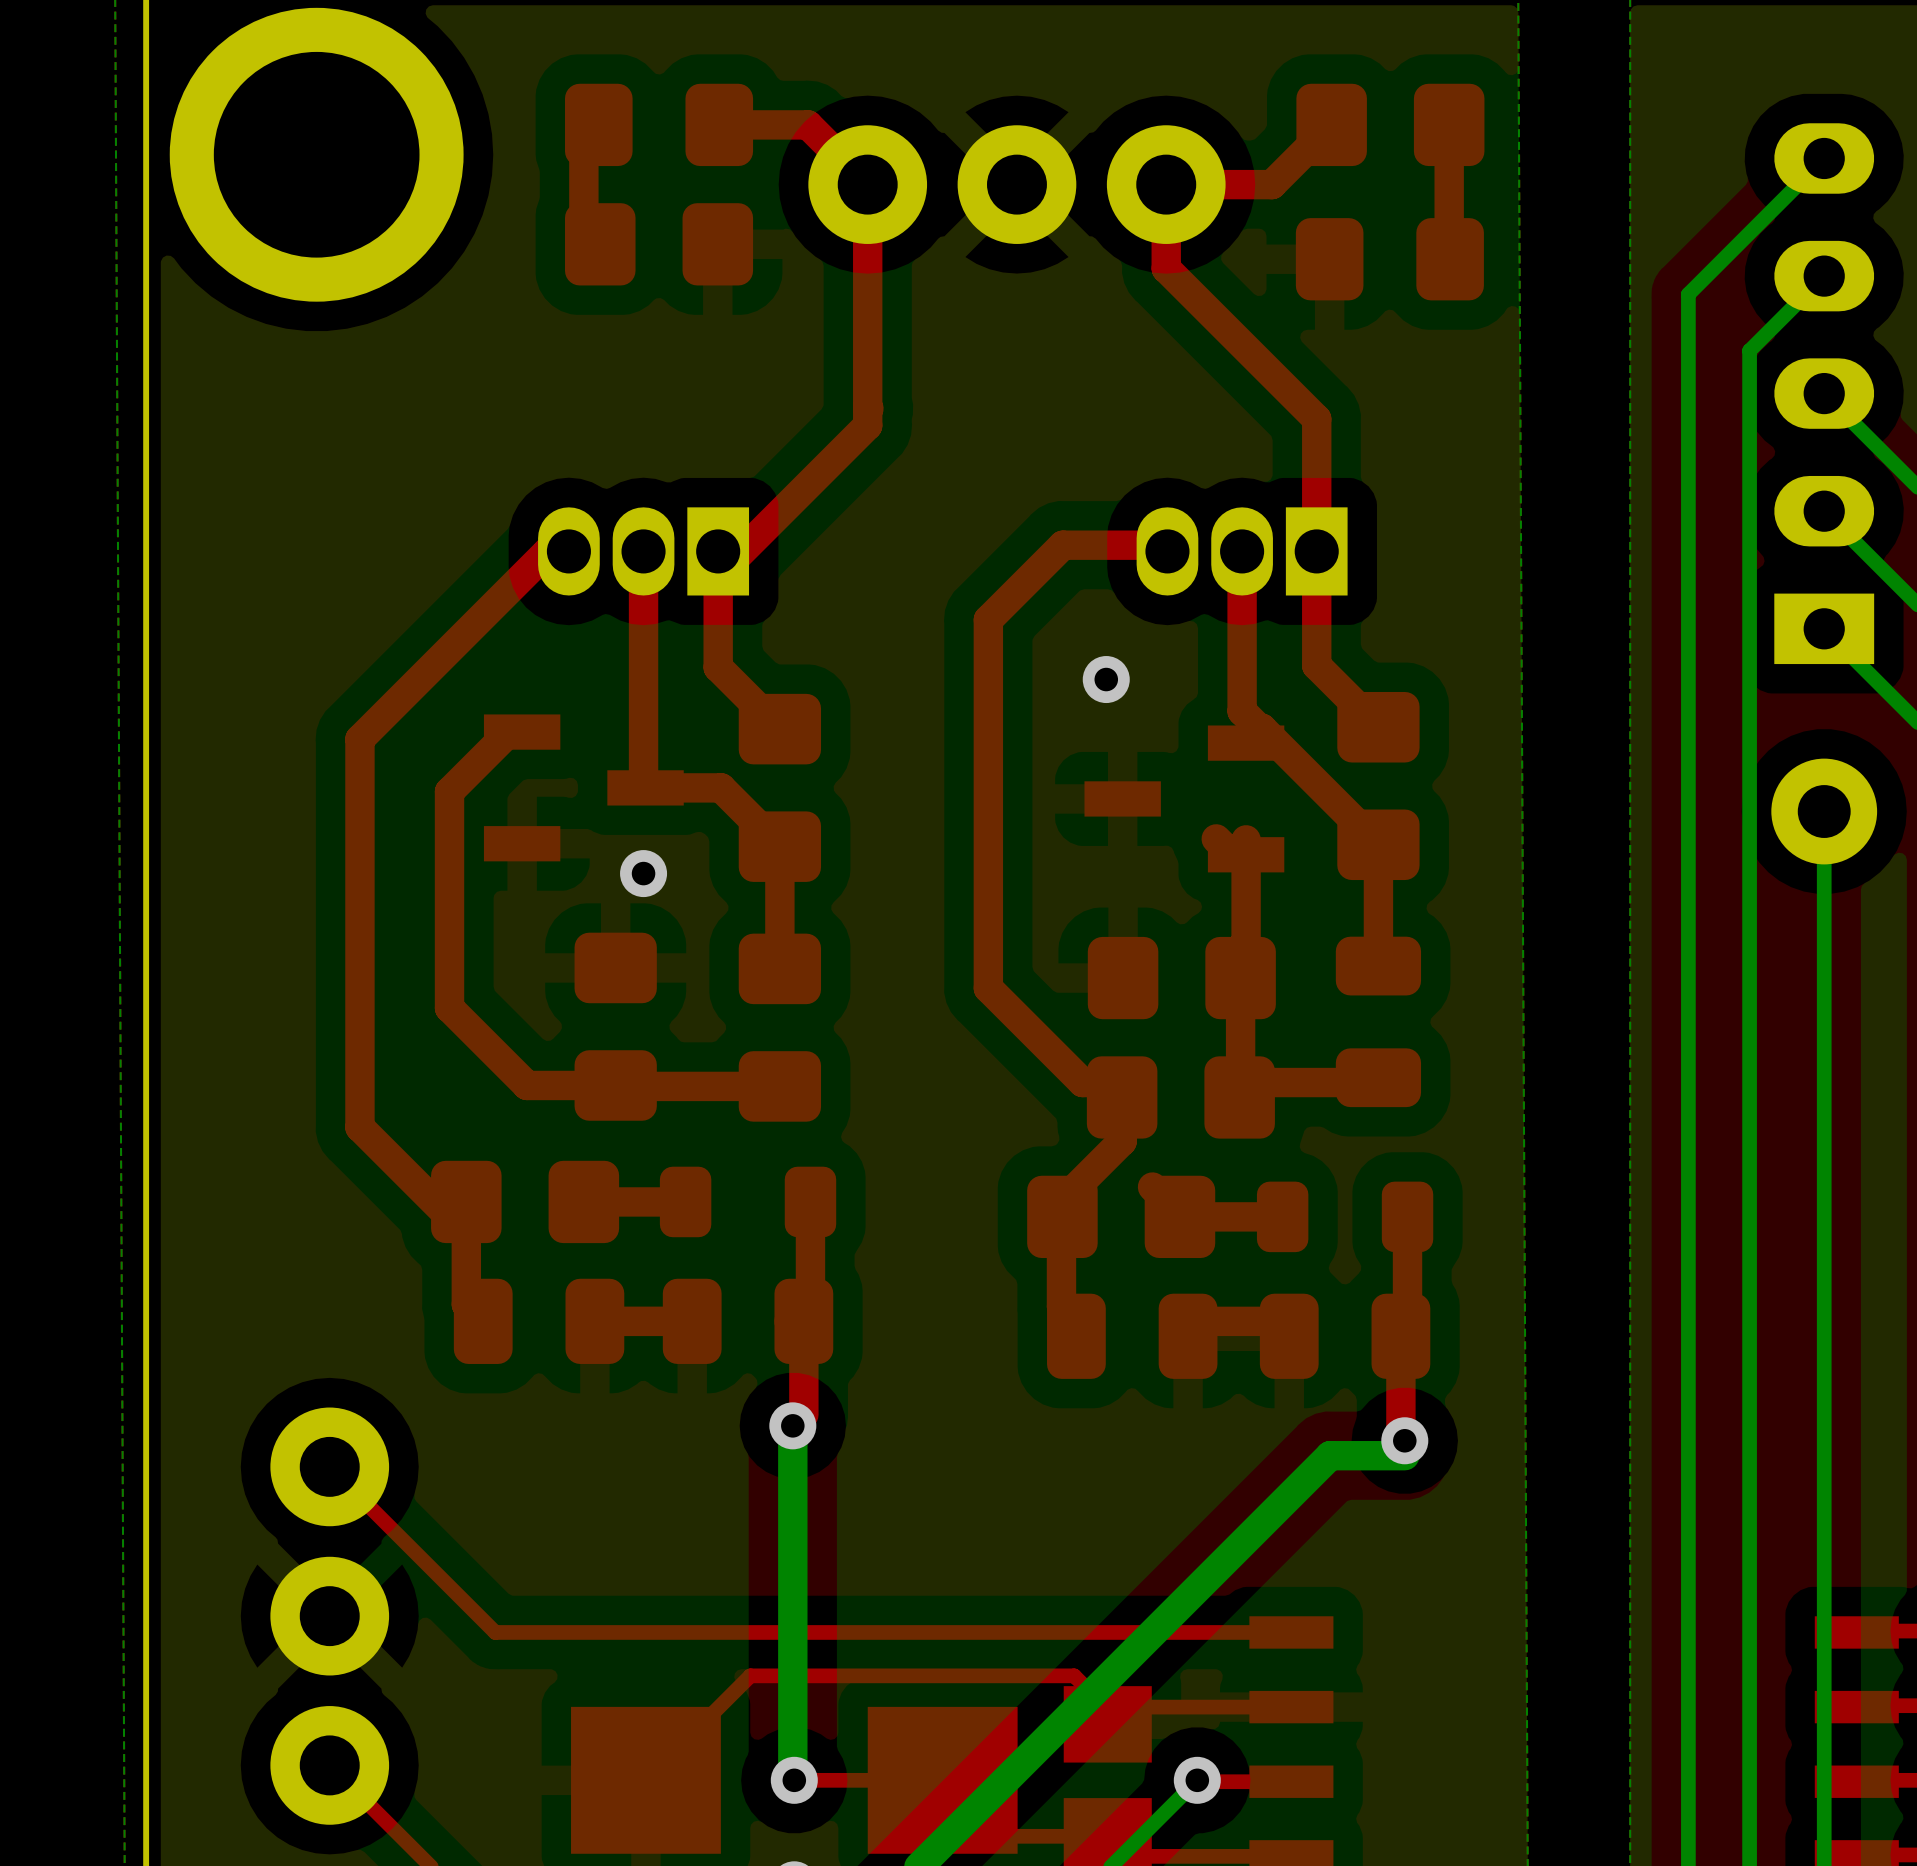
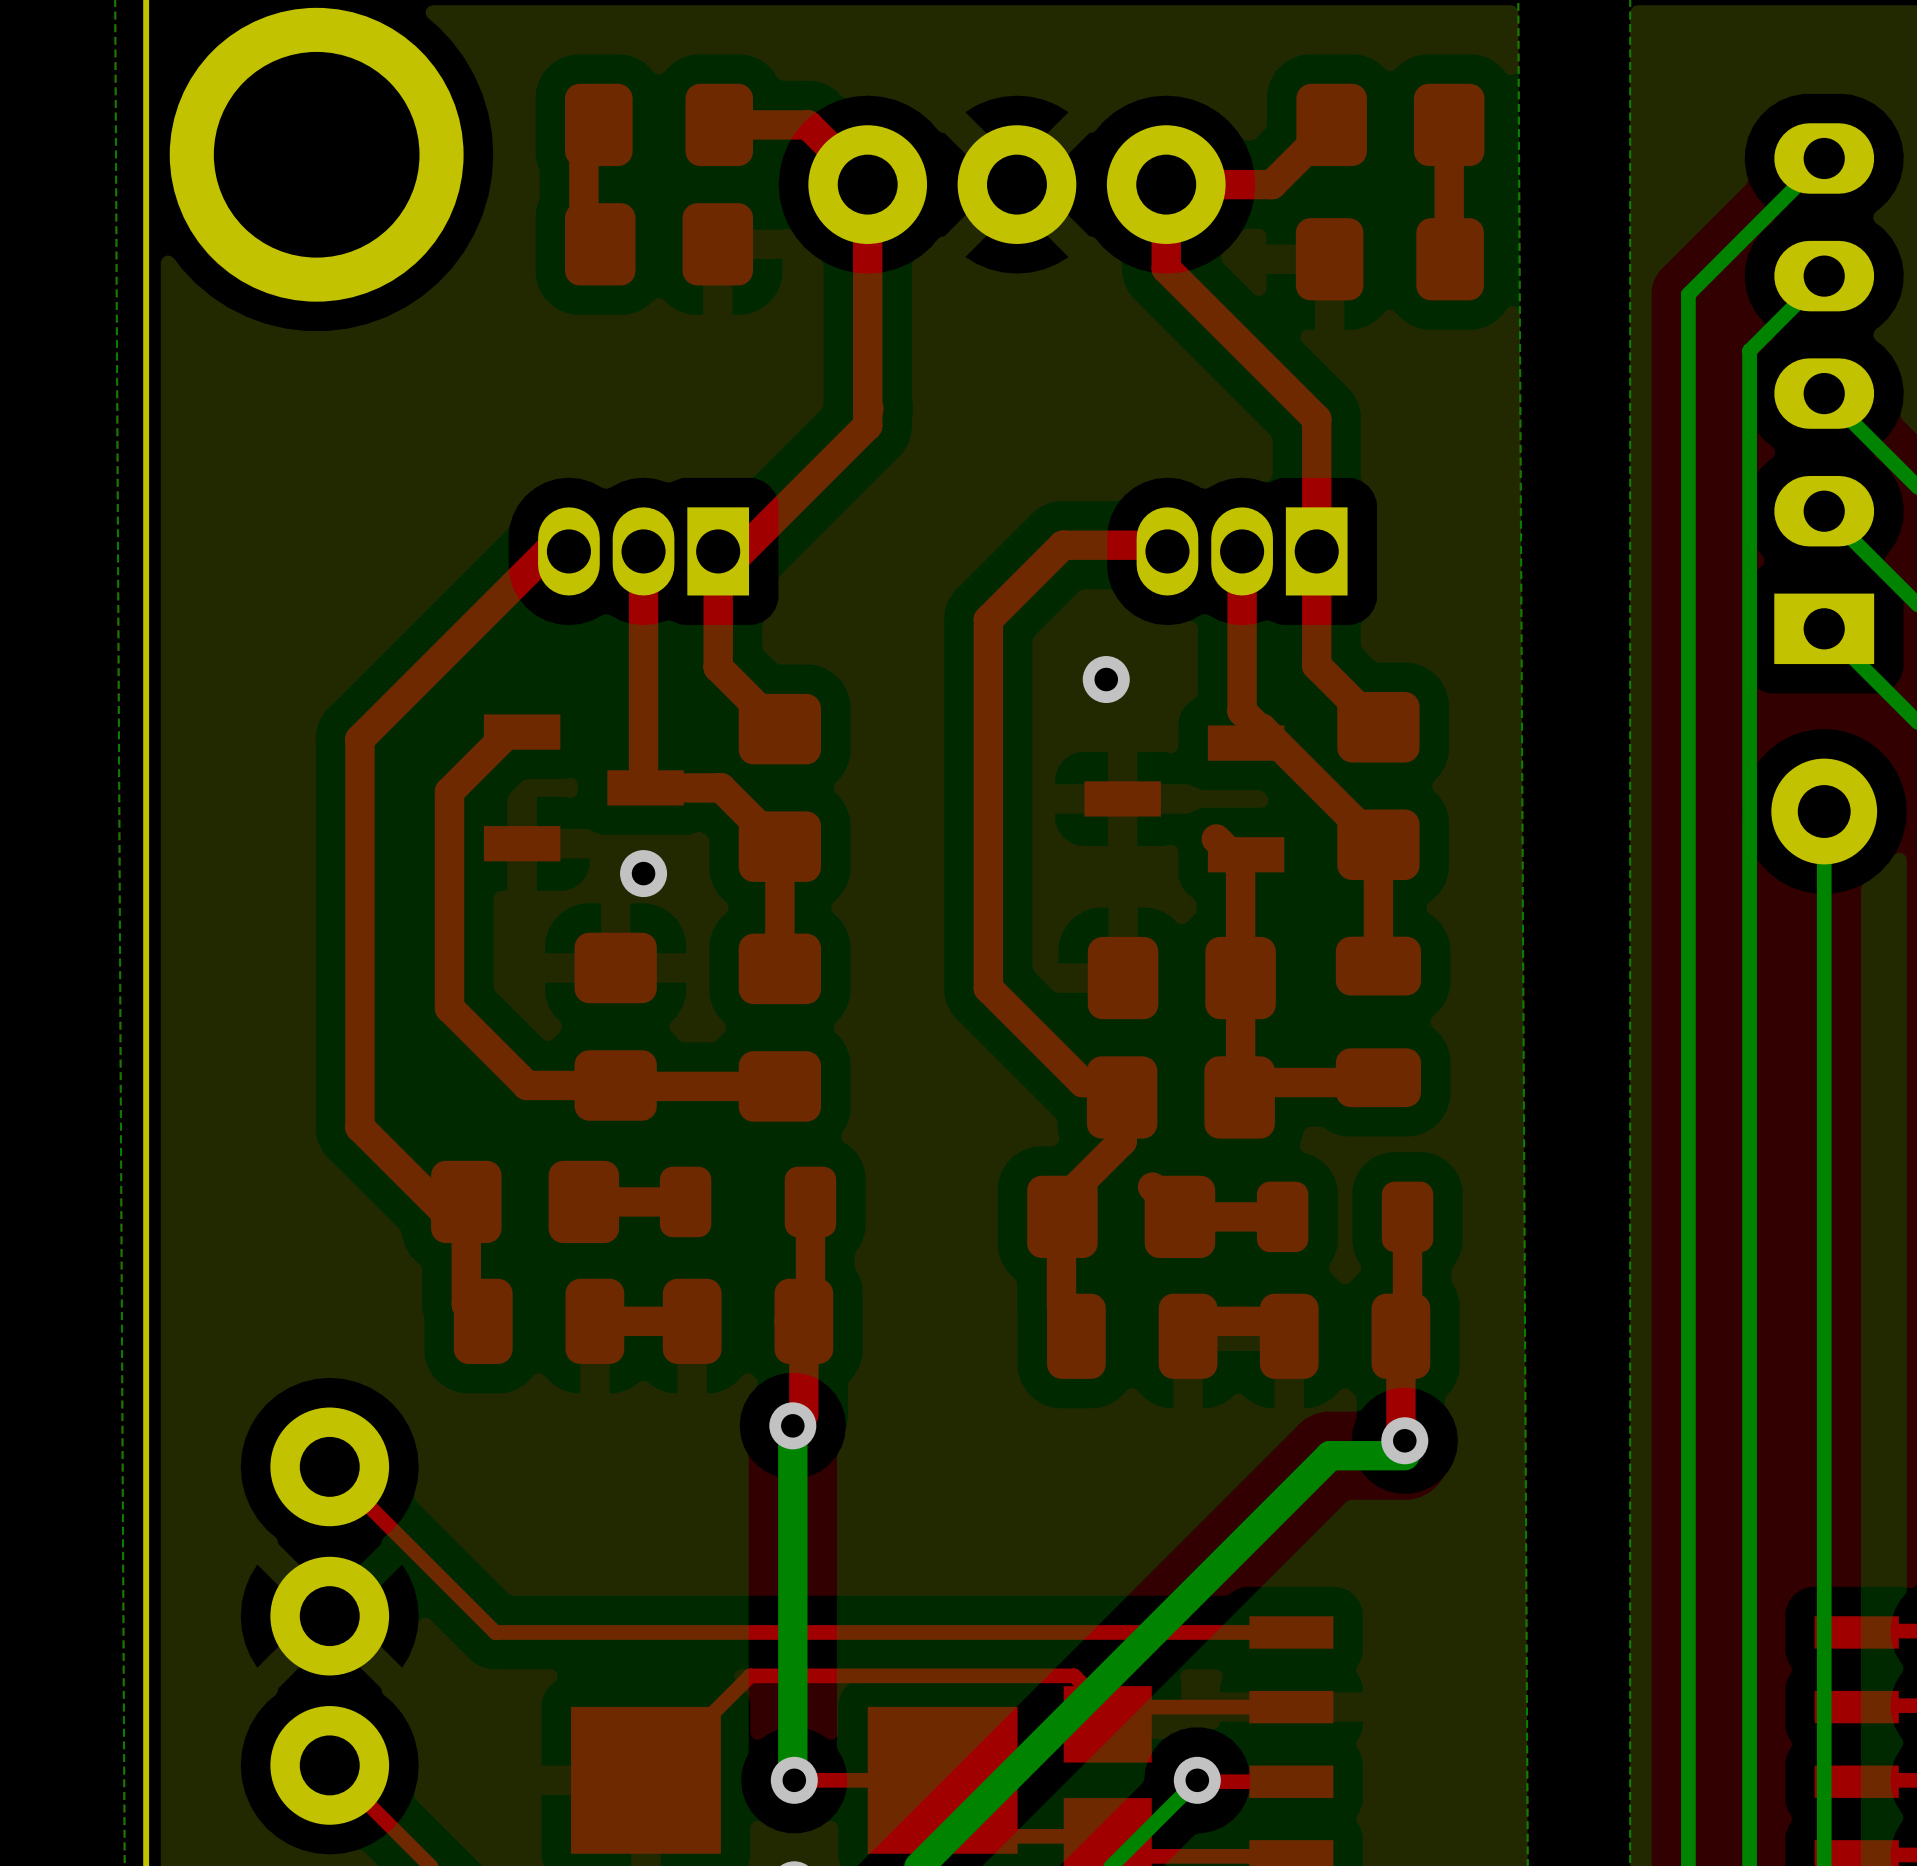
top track: (1246, 839) (1246, 942) (1240, 948) -> (1246, 854) (1240, 860) (1240, 948)

